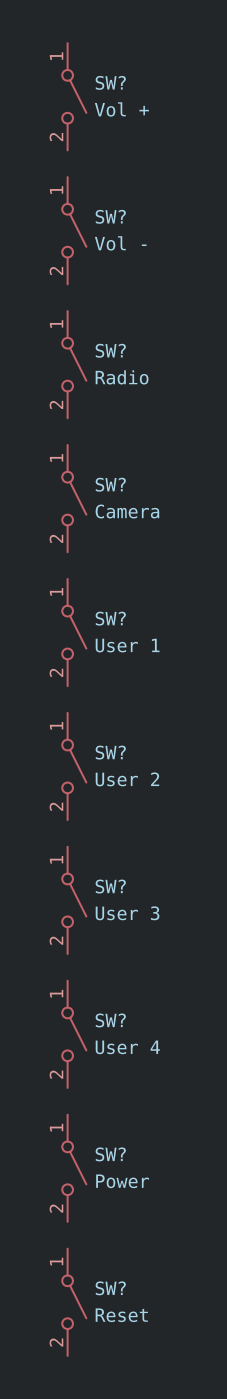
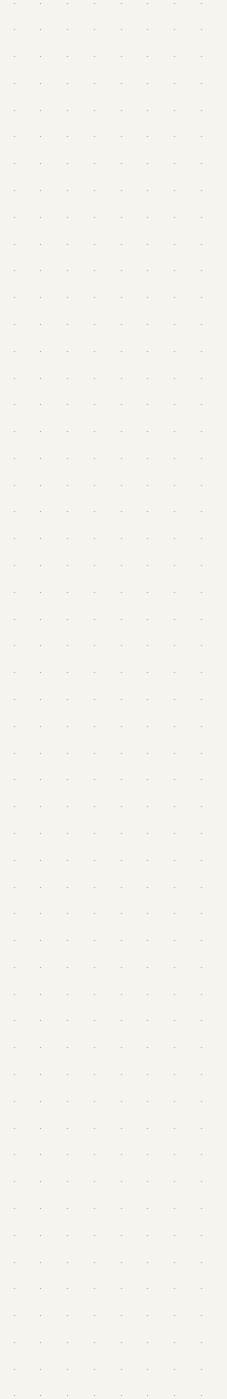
SW?: Vol + (74, 96) -> none
SW?: Vol - (74, 230) -> none
SW?: Radio (74, 364) -> none
SW?: Camera (74, 498) -> none
SW?: User 1 (74, 632) -> none
SW?: User 2 (74, 766) -> none
SW?: User 3 (74, 900) -> none
SW?: User 4 (74, 1034) -> none
SW?: Power (74, 1168) -> none
SW?: Reset (74, 1302) -> none

